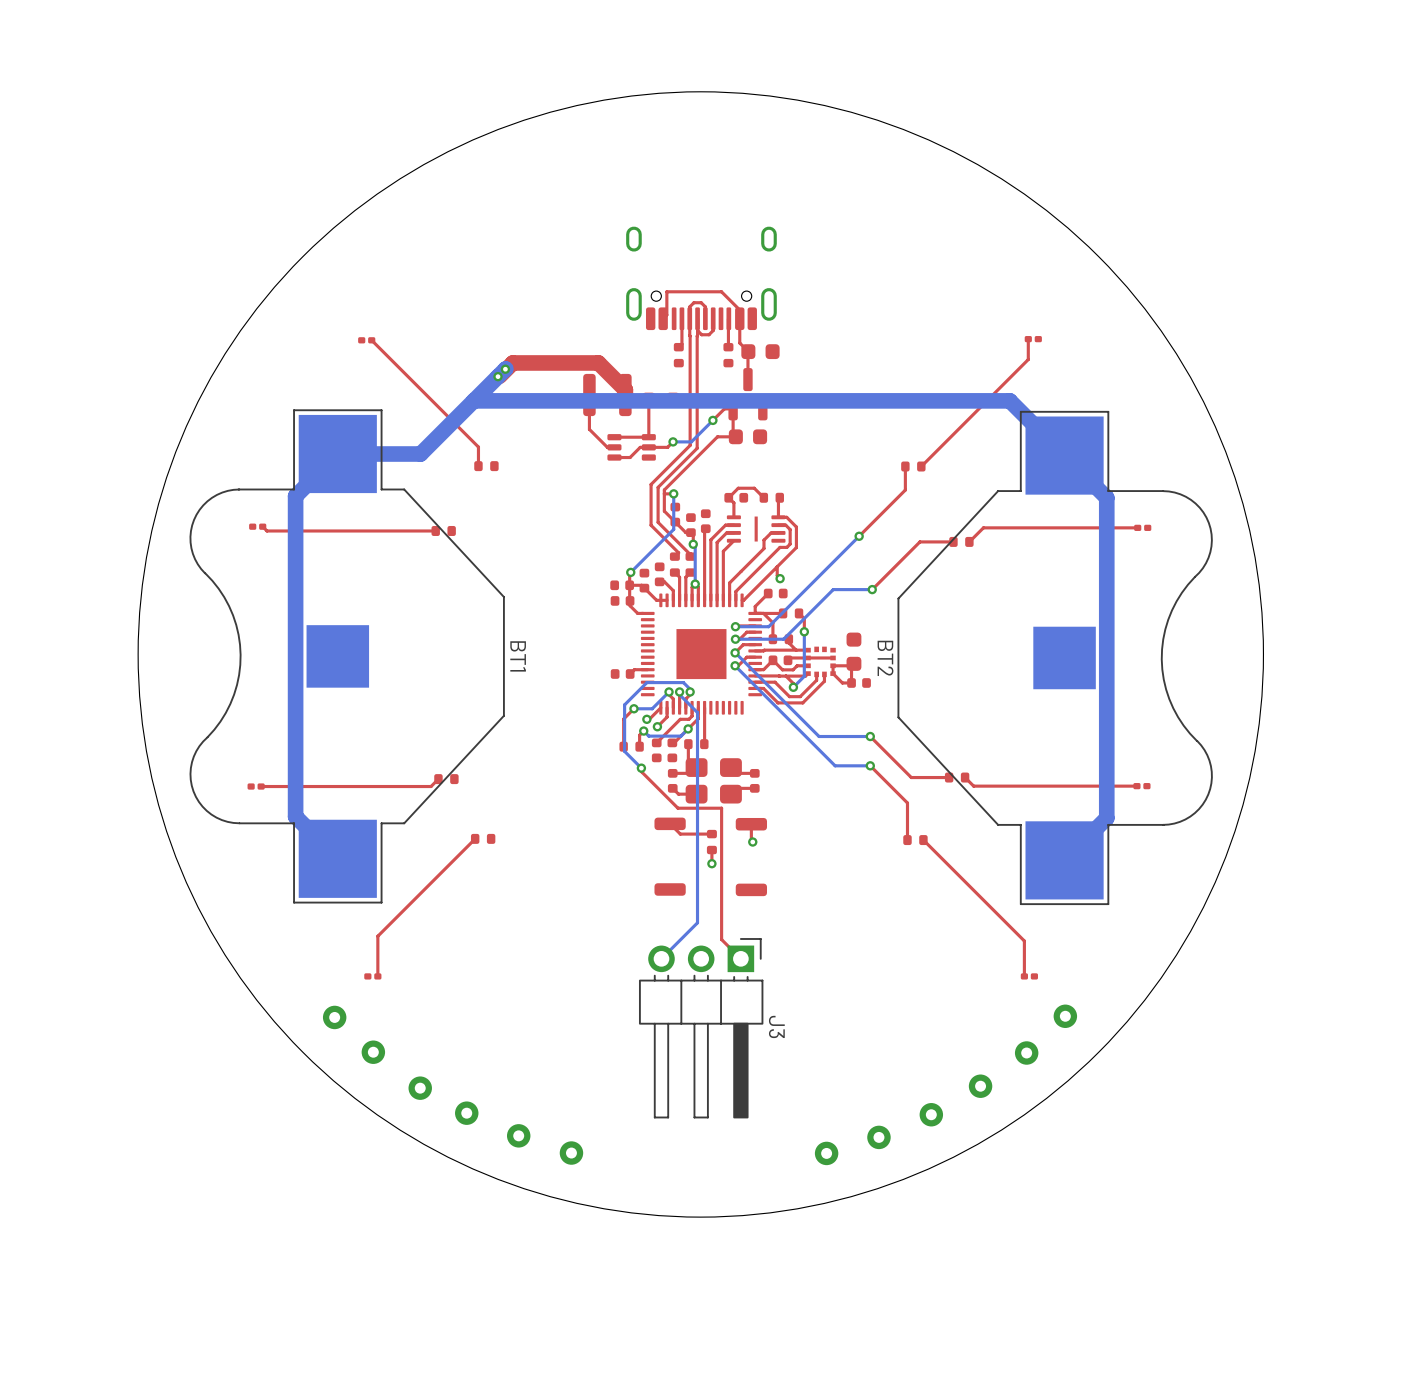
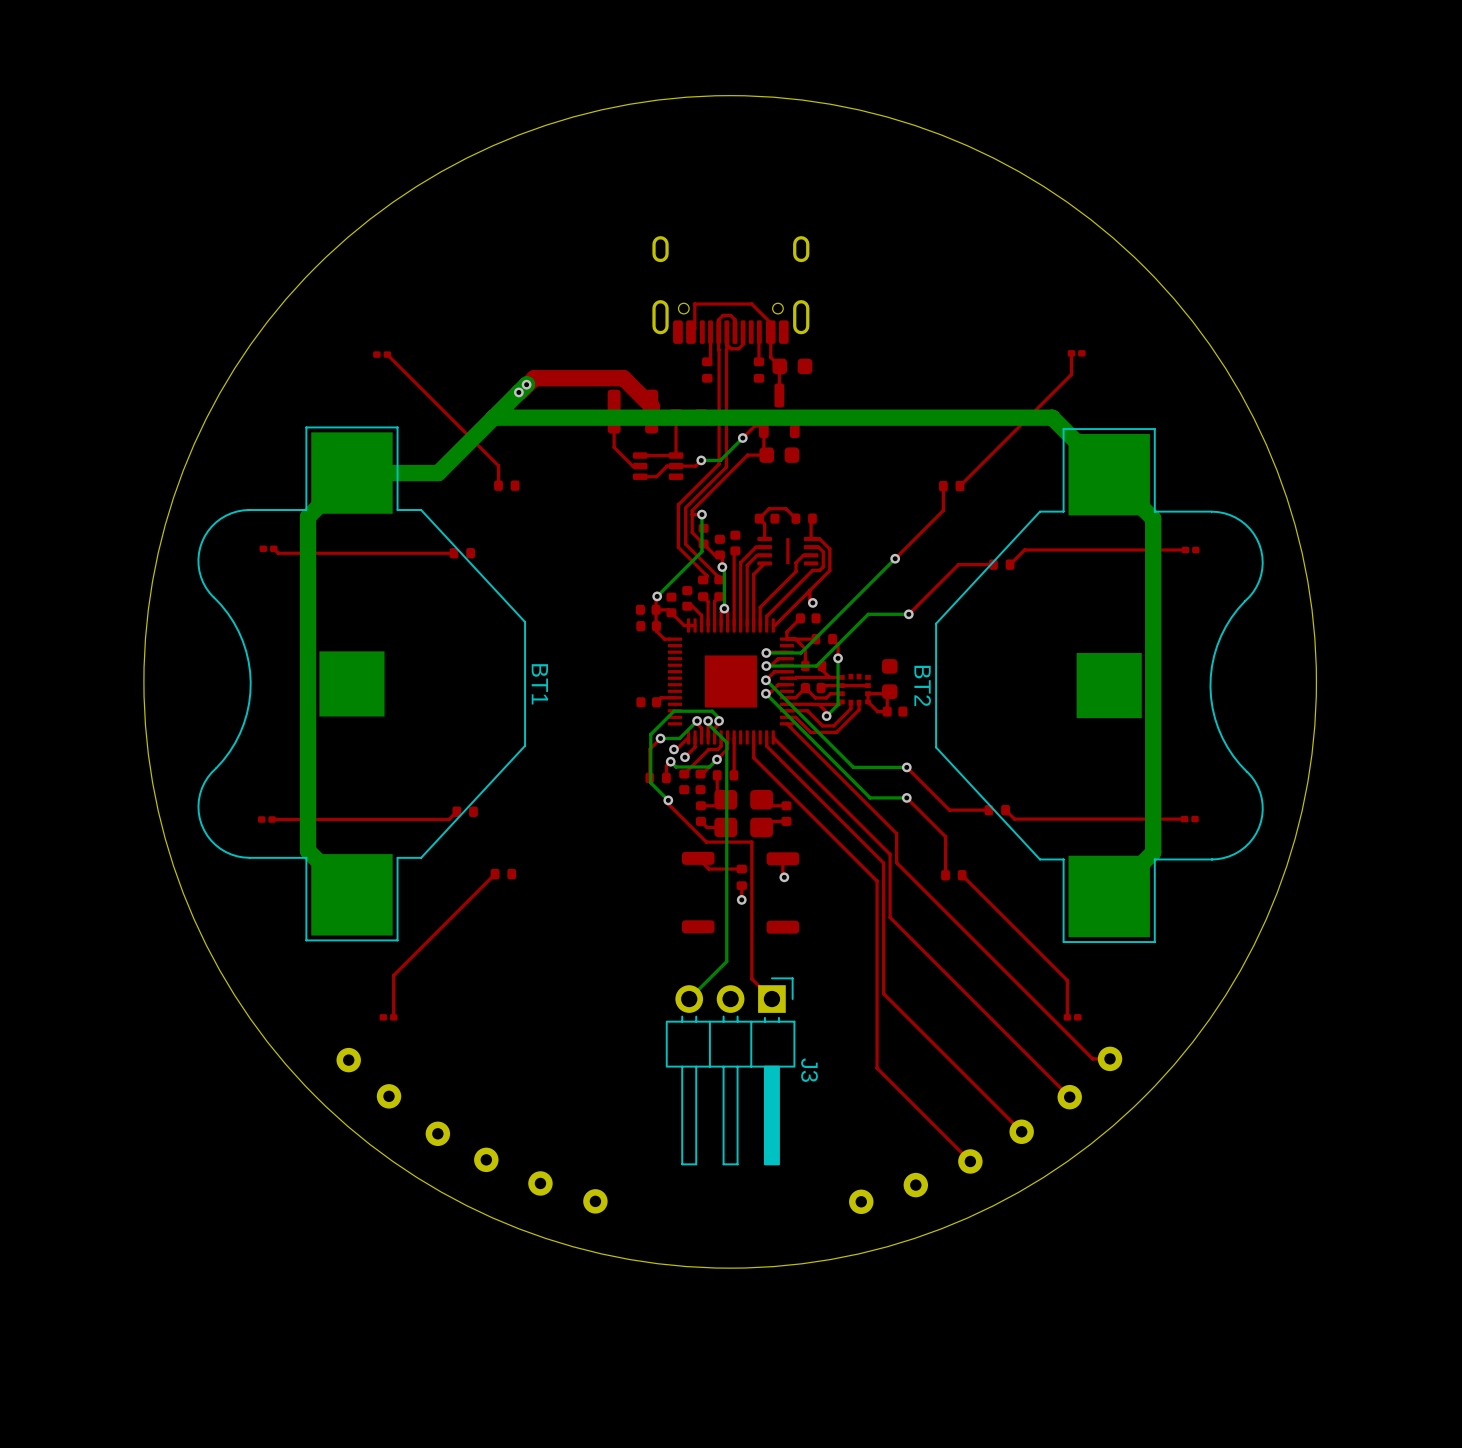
top track: none -> (786, 723) (896, 833) (896, 862) (1092, 1058) (1110, 1058)
top track: none -> (753, 737) (753, 757) (877, 881) (877, 1068) (970, 1161)
top track: none -> (766, 737) (766, 746) (883, 863) (883, 993) (1021, 1131)
top track: none -> (773, 737) (890, 854) (890, 917) (1069, 1097)

